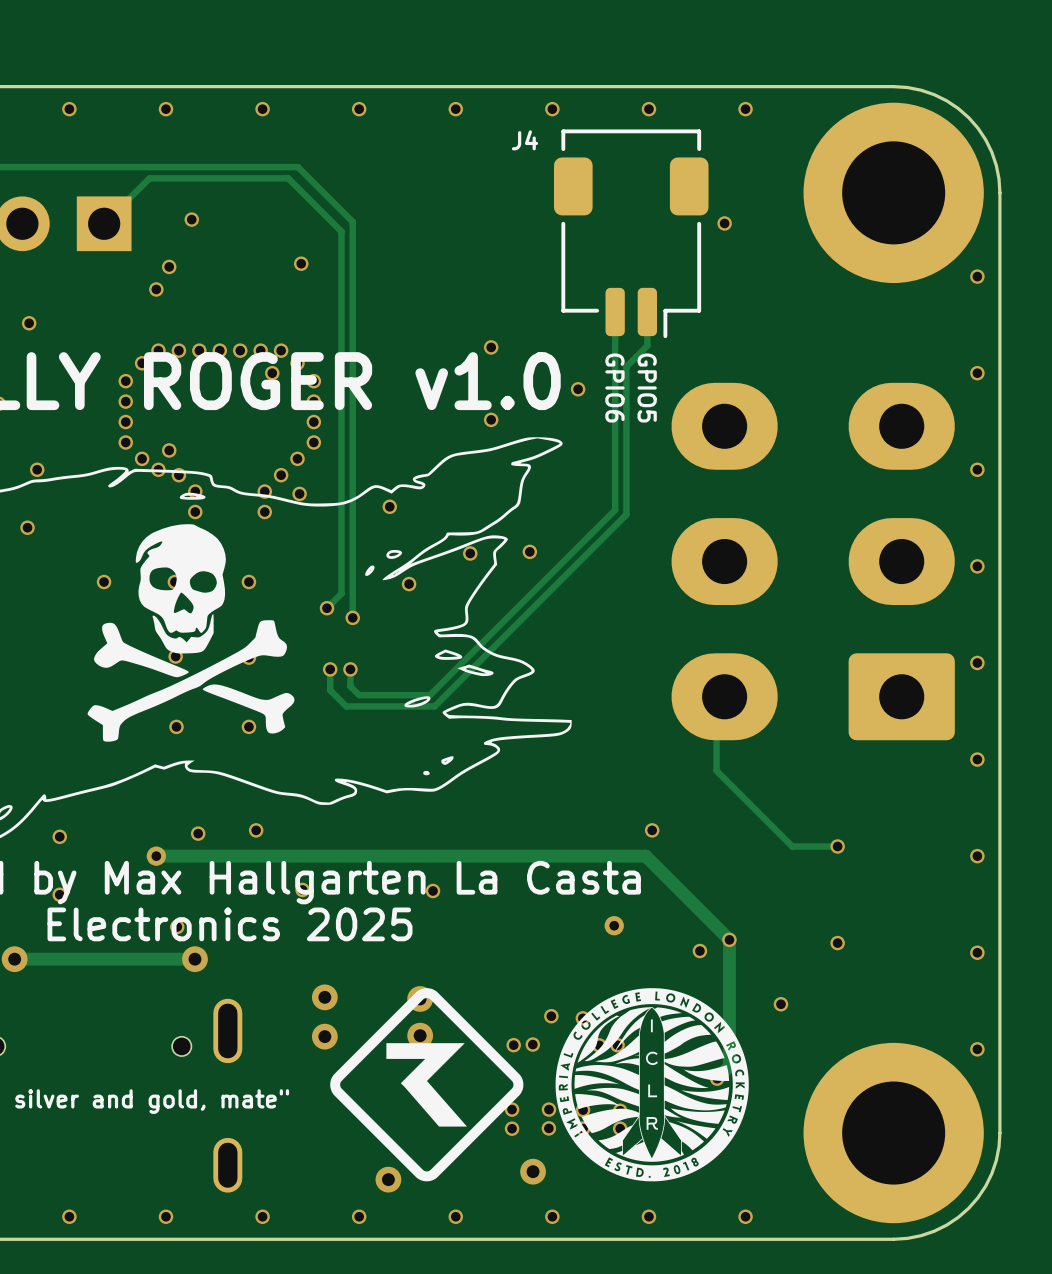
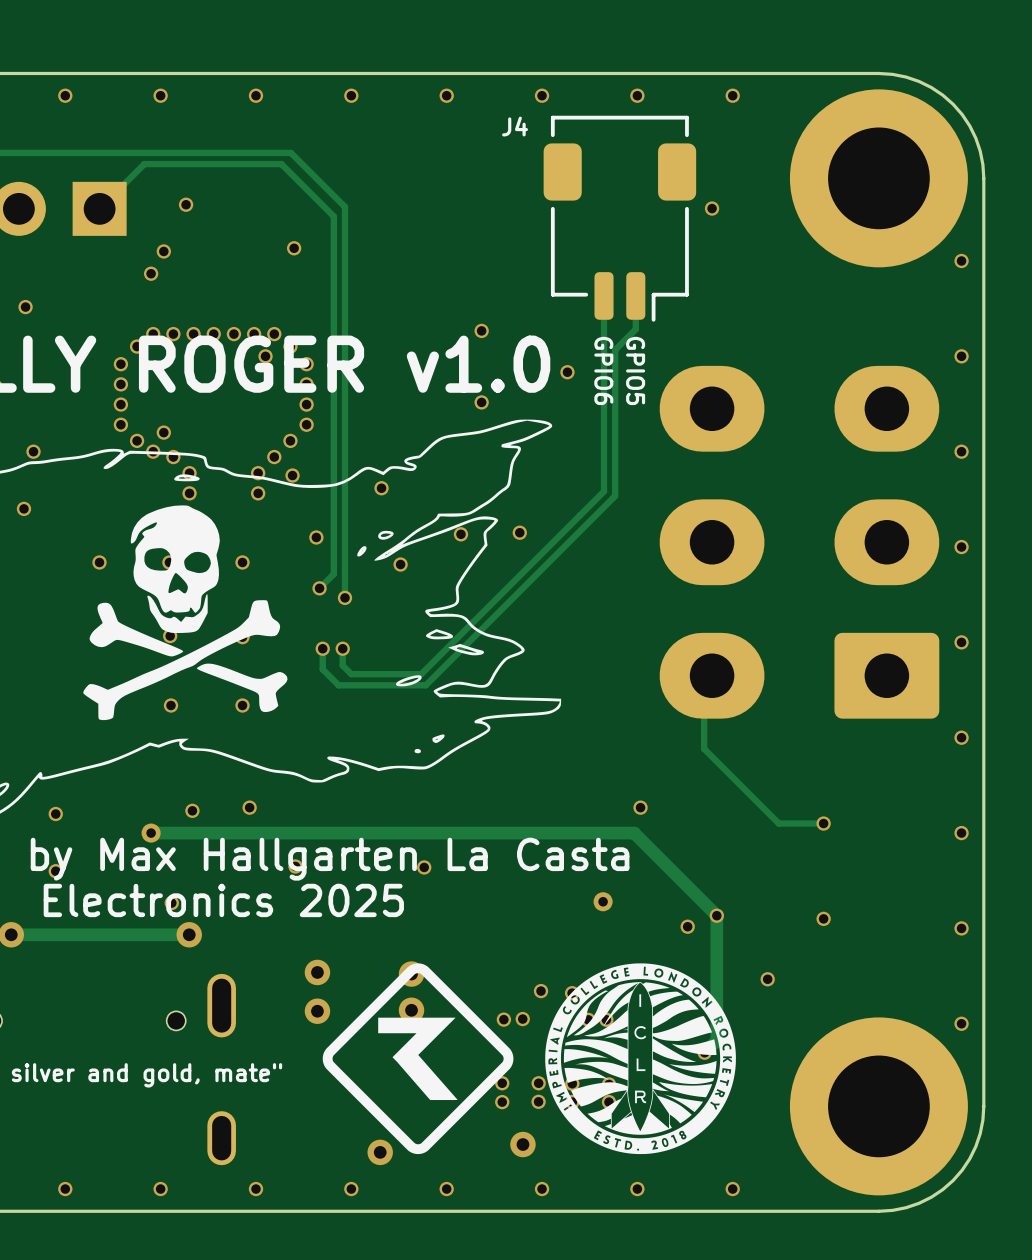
via: none -> (316, 537)

